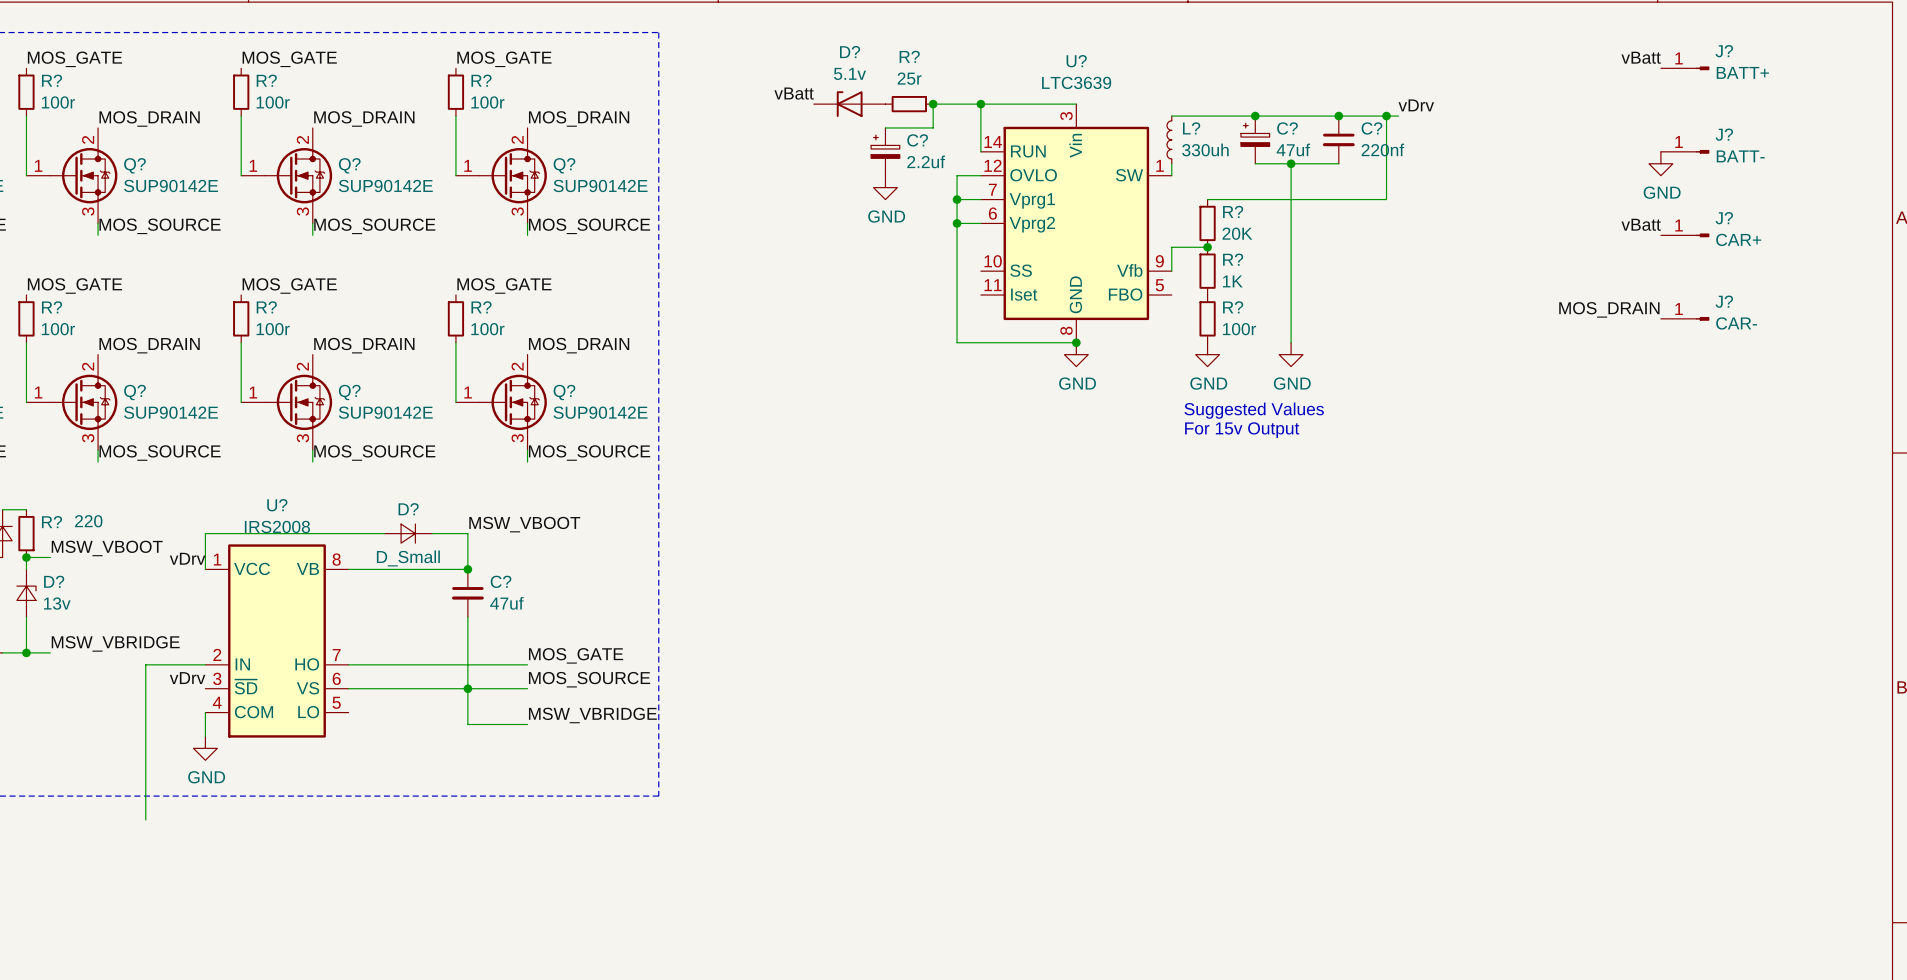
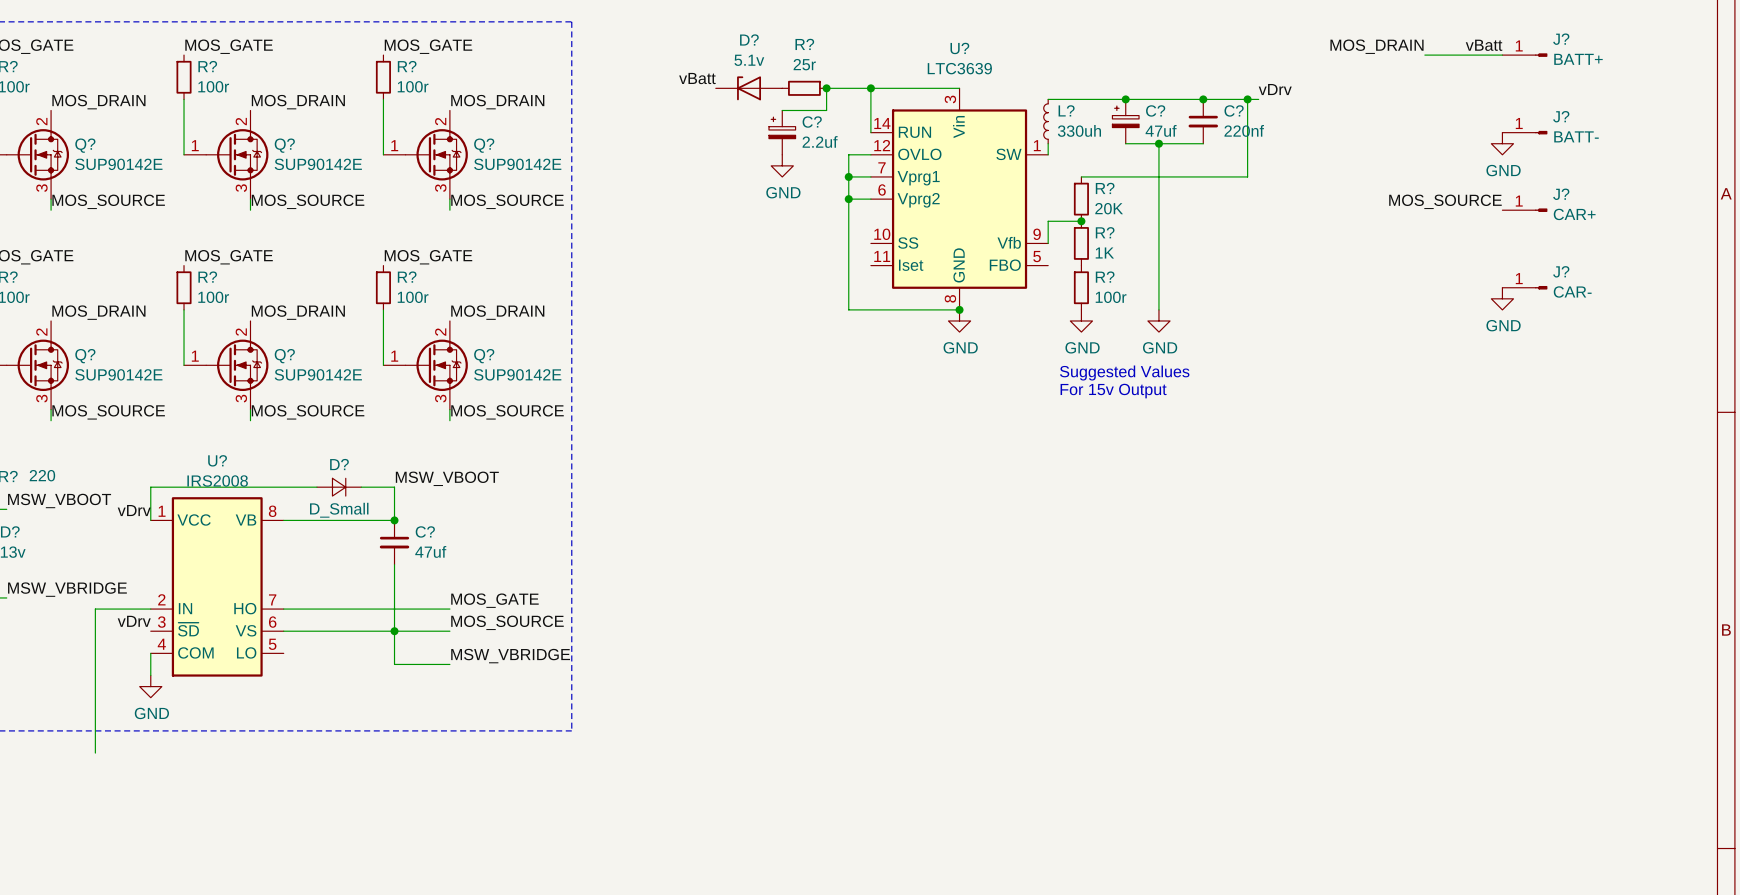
label: none -> MOS_DRAIN (1377, 46)
wire: none -> (1424, 55) (1502, 55)
label: vBatt (1641, 224) -> MOS_SOURCE (1445, 201)
label: MOS_DRAIN (1609, 309) -> none
power symbol: none -> GND (1502, 298)

